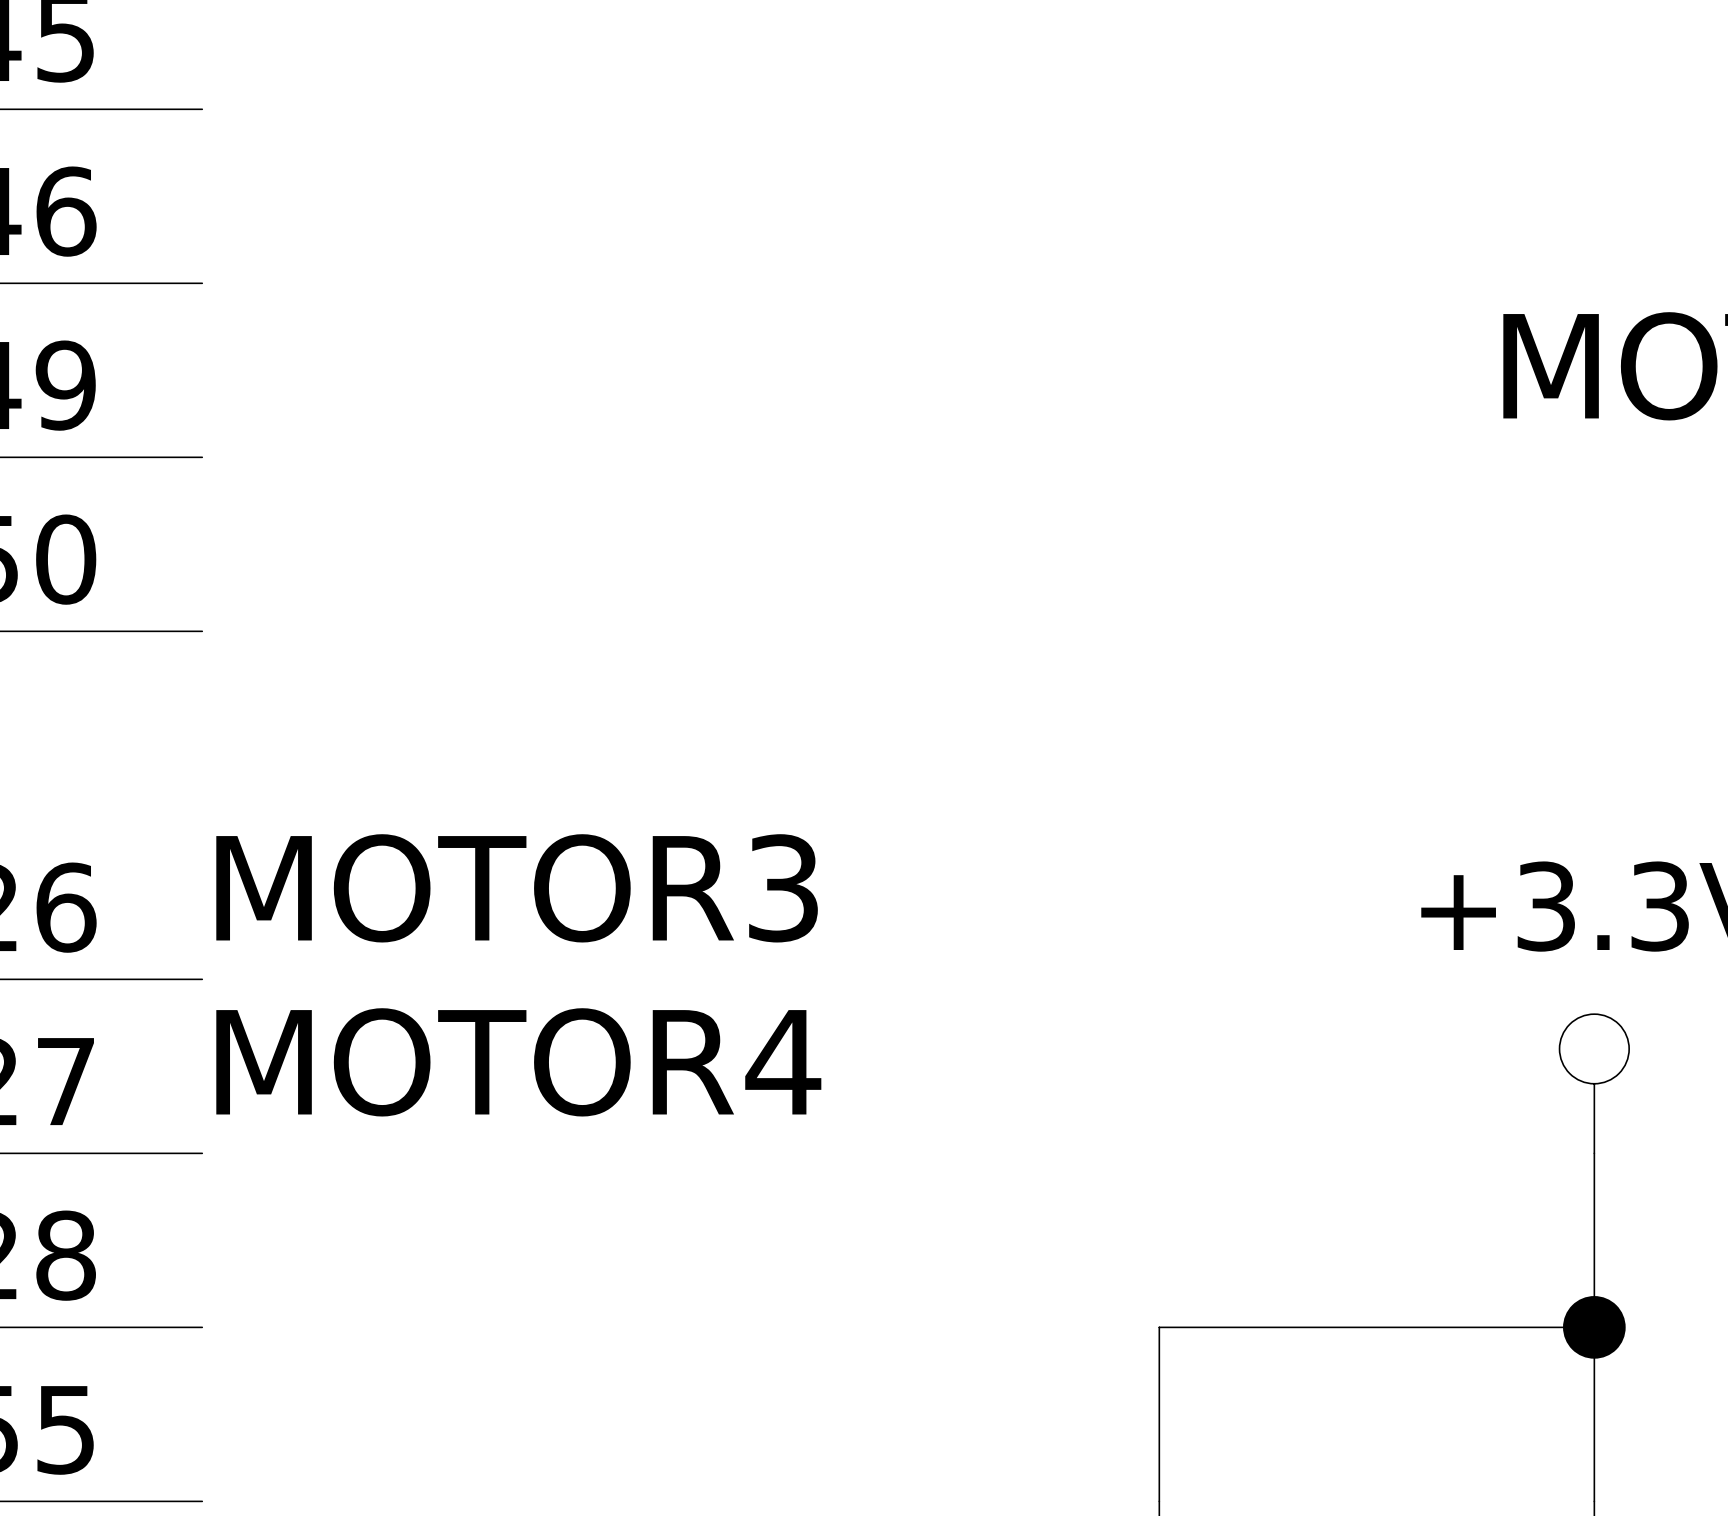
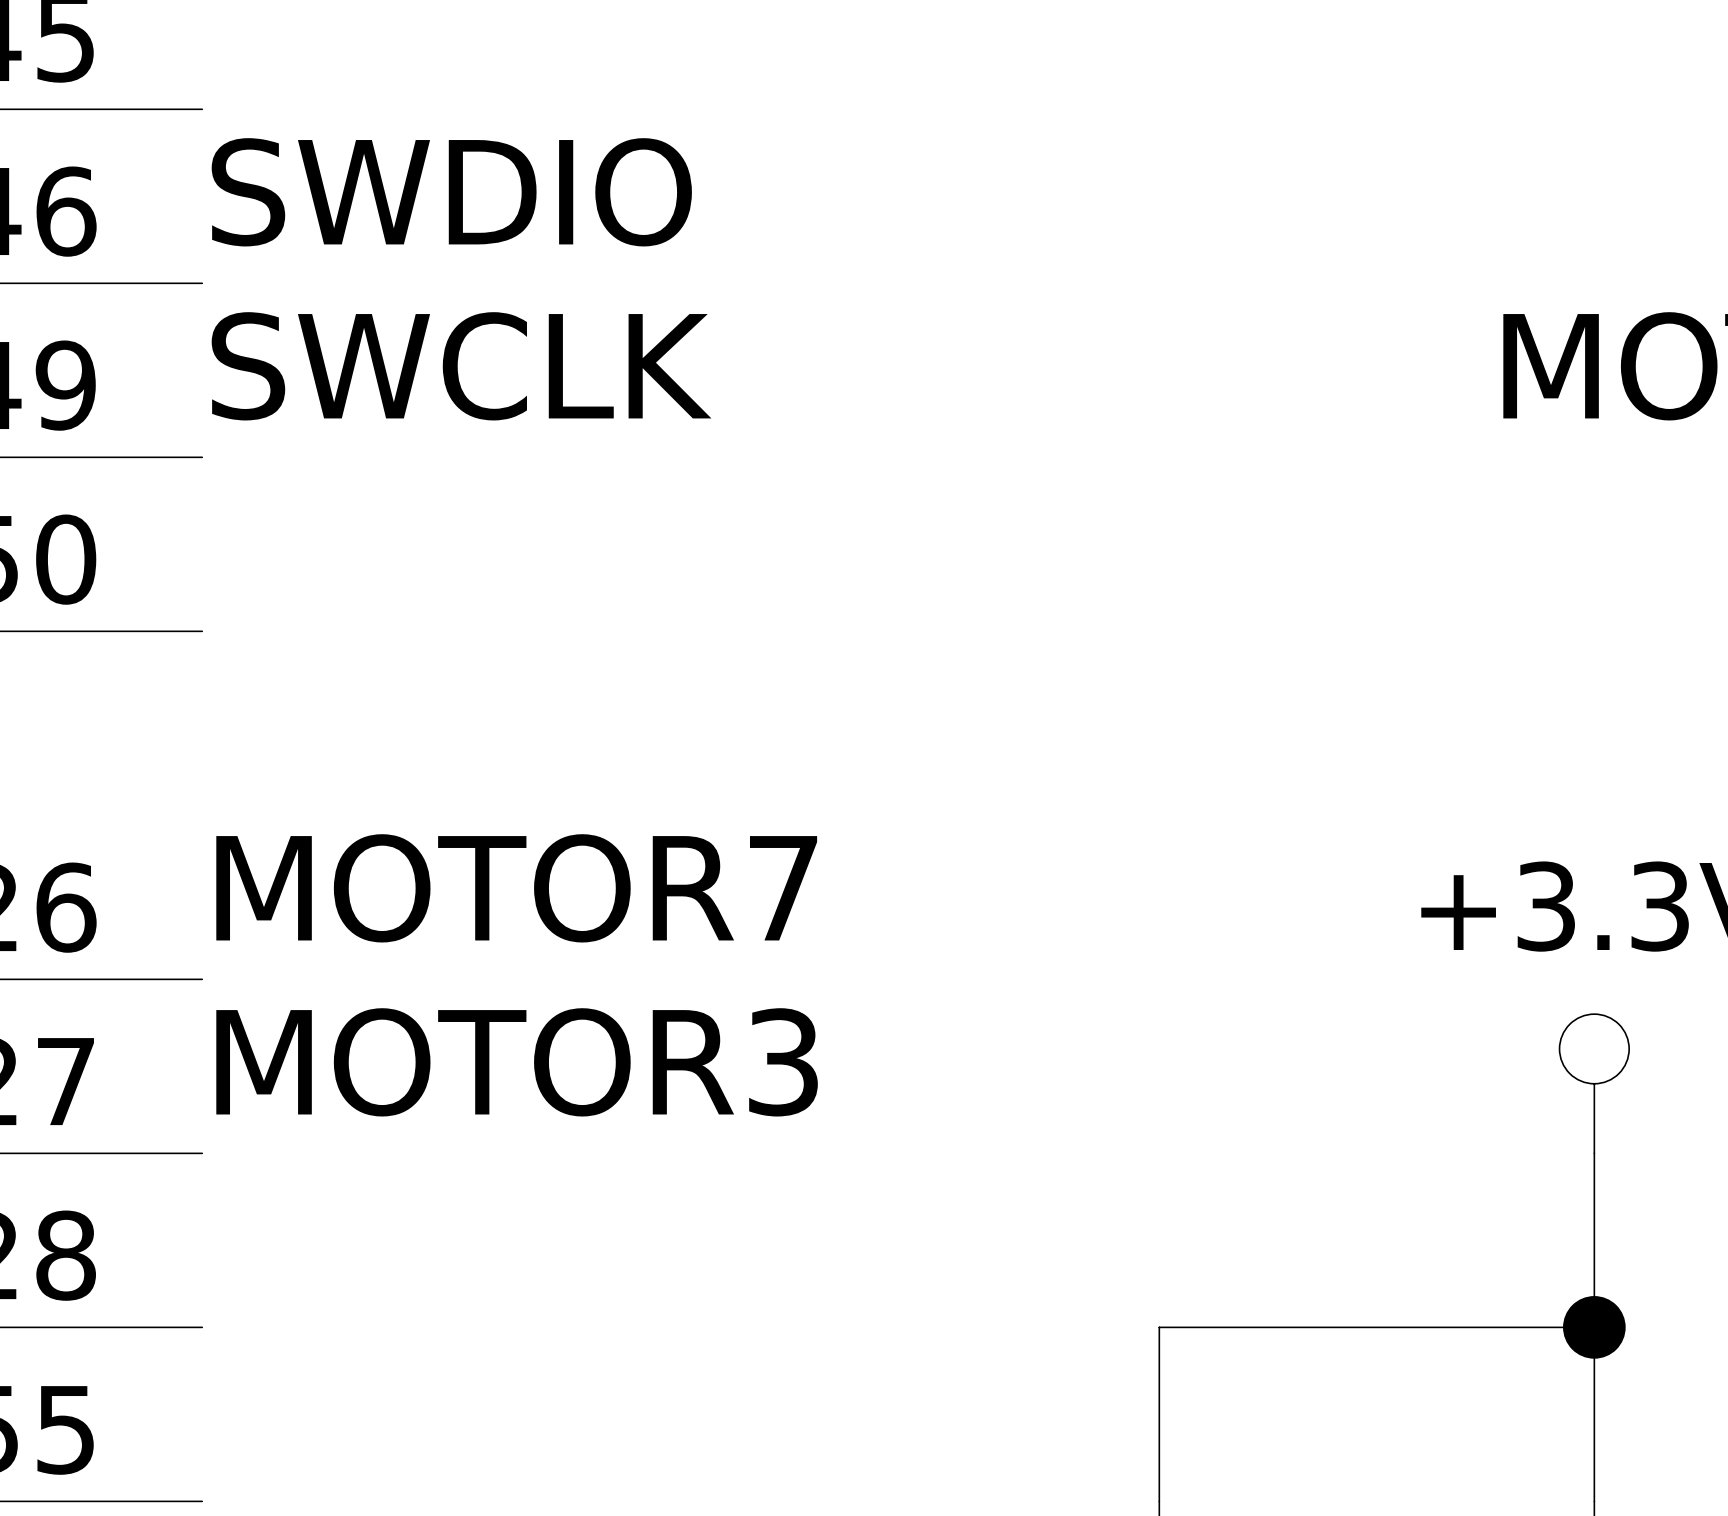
label: none -> SWDIO (451, 192)
label: none -> SWCLK (461, 366)
label: MOTOR3 (517, 888) -> MOTOR7 (516, 888)
label: MOTOR4 (518, 1062) -> MOTOR3 (517, 1062)

